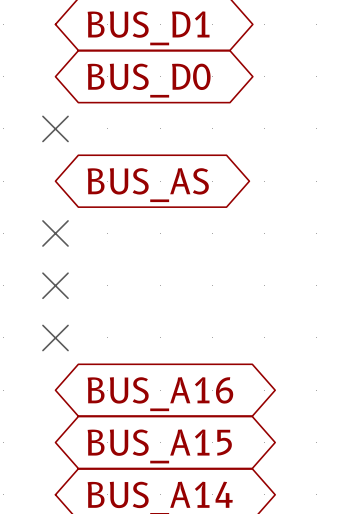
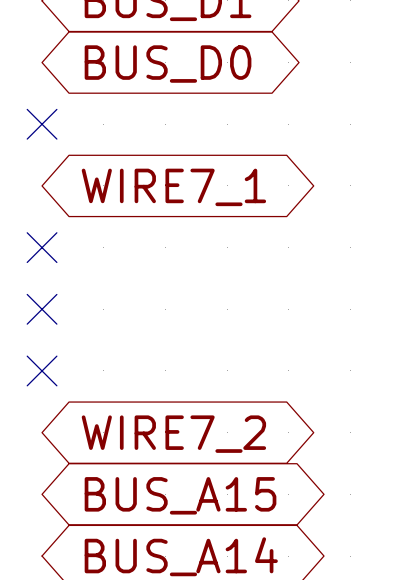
global label: BUS_AS (148, 185) -> WIRE7_1 (173, 187)
global label: BUS_A16 (160, 394) -> WIRE7_2 (173, 434)

